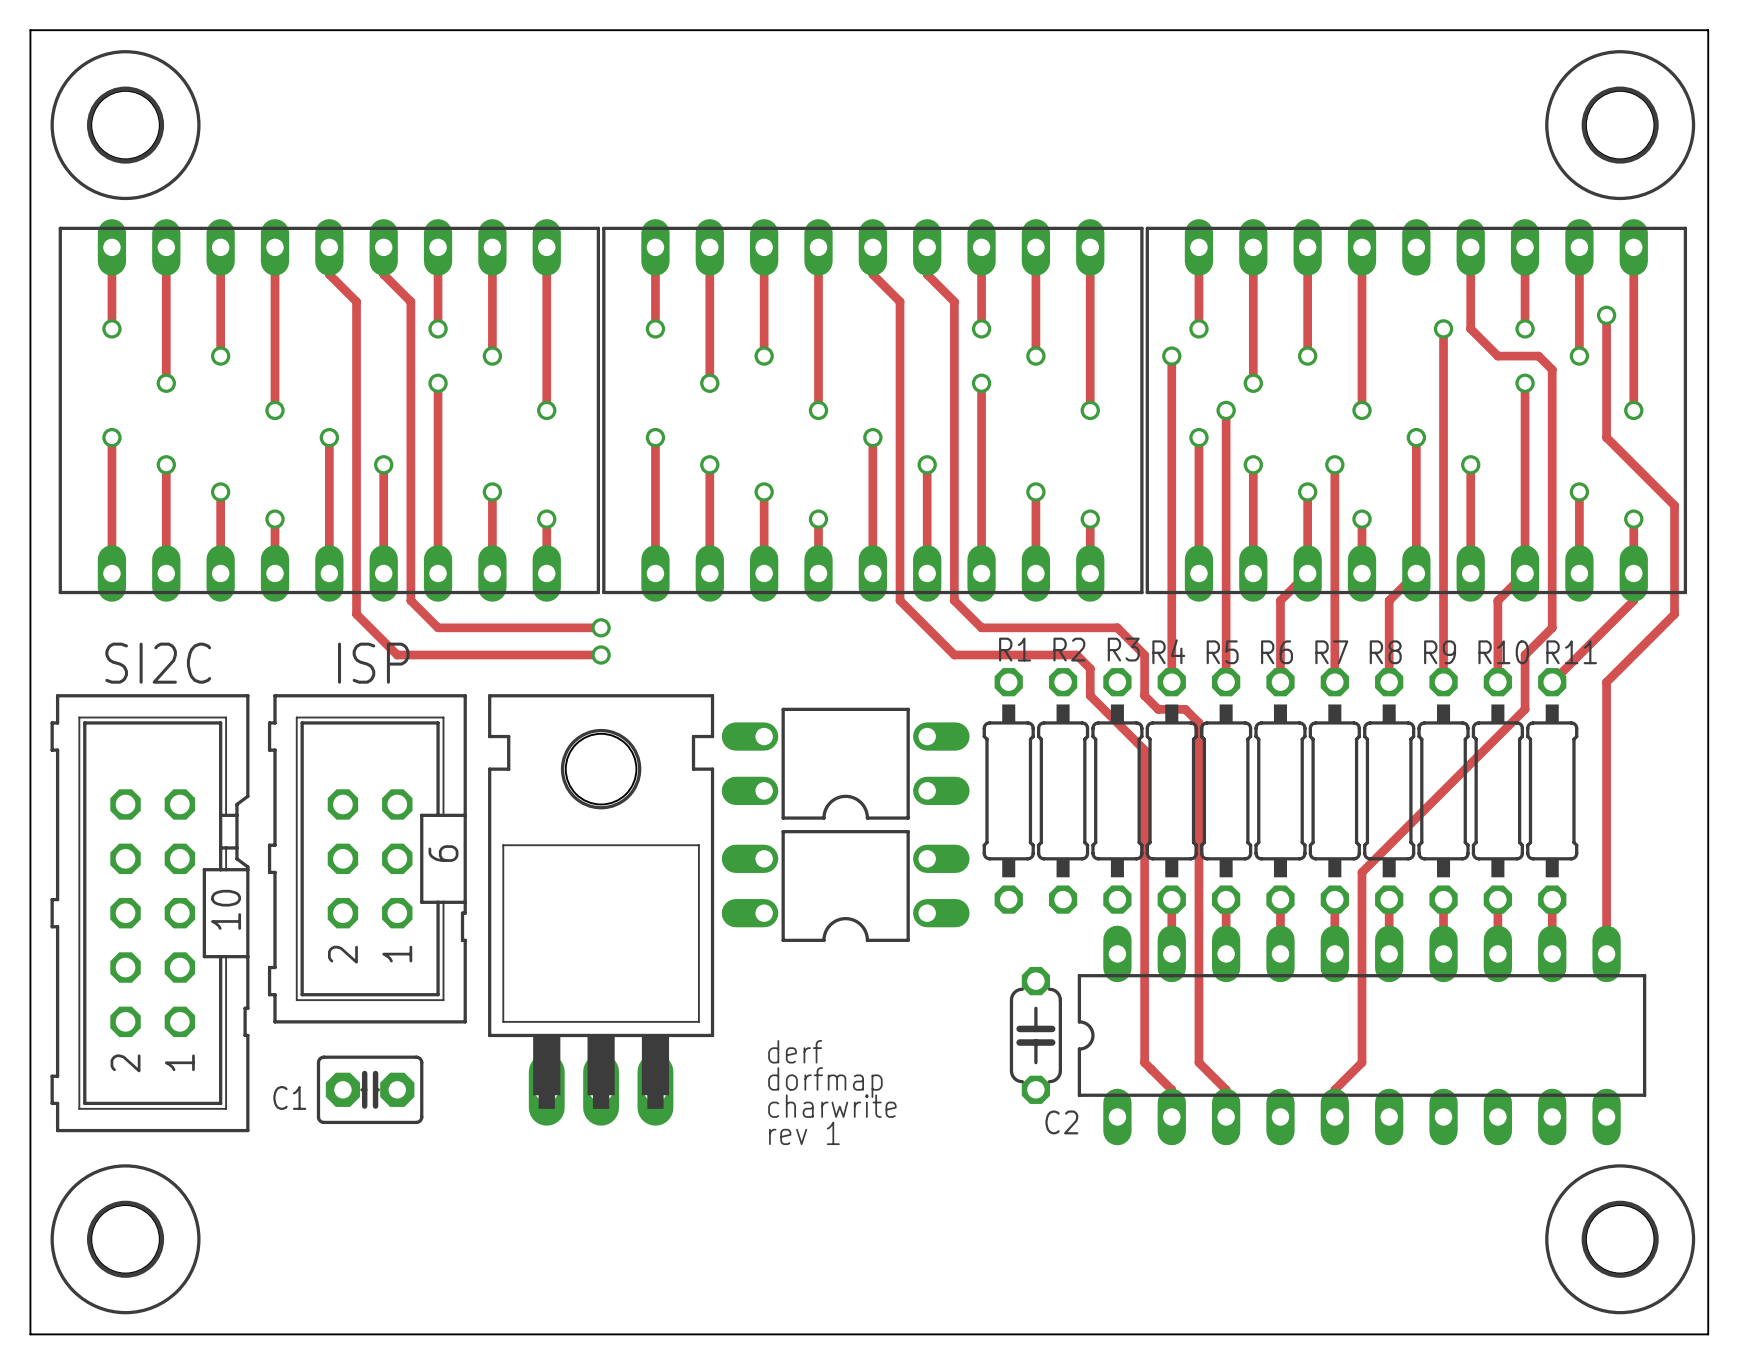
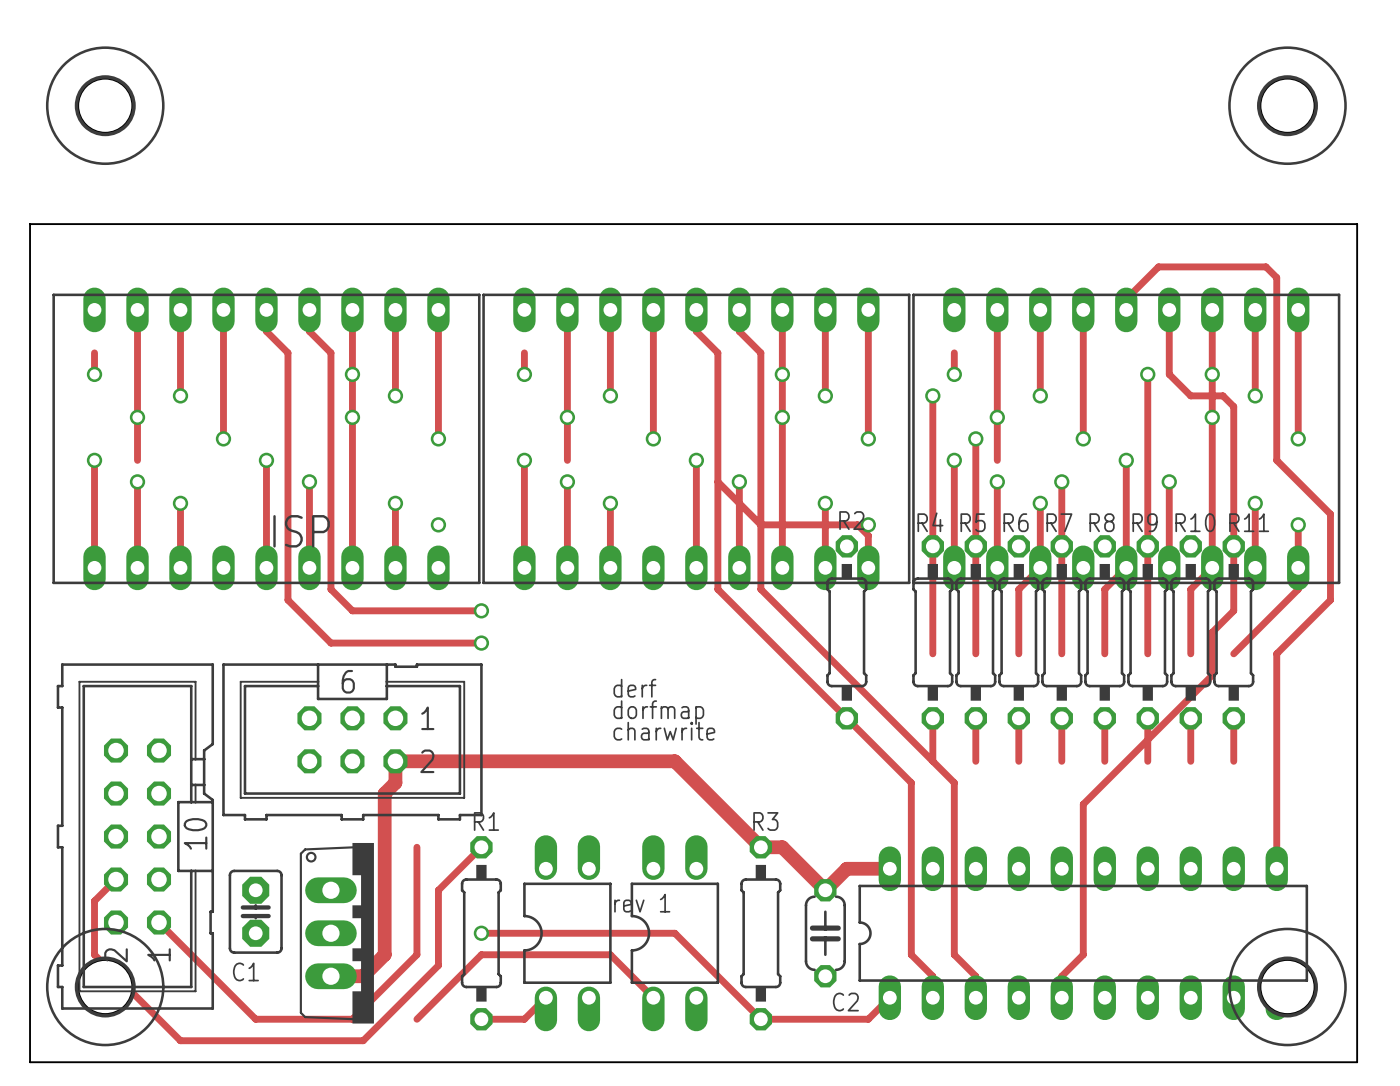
track: (111, 247) (111, 328) -> (180, 503) (180, 567)
track: (166, 247) (166, 383) -> (137, 374) (137, 309)
track: (220, 247) (220, 356) -> (223, 331) (223, 417)
track: (275, 247) (275, 383) -> (352, 460) (352, 567)
track: (329, 247) (329, 274) (356, 301) (356, 437) -> (266, 309) (266, 331) (287, 352)
track: (383, 247) (383, 274) (410, 301) (410, 437) -> (309, 309) (309, 331) (330, 352)
track: (438, 247) (438, 328) -> (395, 503) (395, 567)
track: (492, 247) (492, 356) -> (438, 331) (438, 417)
track: (546, 247) (546, 383) -> none
track: (655, 247) (655, 328) -> (610, 503) (610, 567)
track: (709, 247) (709, 383) -> (567, 374) (567, 309)
track: (764, 247) (764, 356) -> (653, 331) (653, 417)
track: (818, 247) (818, 383) -> (782, 460) (782, 567)
track: (872, 247) (872, 274) (900, 301) (900, 437) -> (696, 309) (696, 331) (717, 352)
track: (927, 247) (927, 274) (954, 301) (954, 437) -> (739, 309) (739, 331) (760, 352)
track: (981, 247) (981, 328) -> (825, 503) (825, 567)
track: (1035, 247) (1035, 356) -> (868, 331) (868, 417)
track: (1090, 247) (1090, 383) -> (932, 546) (932, 653)
track: (1198, 247) (1198, 328) -> none
track: (1253, 247) (1253, 383) -> (997, 374) (997, 309)
track: (1307, 247) (1307, 356) -> (1083, 331) (1083, 417)
track: (1362, 247) (1362, 383) -> (1147, 546) (1147, 653)
track: (1470, 247) (1470, 328) (1497, 356) (1538, 356) (1552, 369) (1552, 505) -> (1169, 309) (1169, 374) (1190, 395) (1223, 395) (1233, 406)
track: (1525, 247) (1525, 328) -> (1255, 503) (1255, 567)
track: (1579, 247) (1579, 356) -> (1298, 331) (1298, 417)
track: (1633, 247) (1633, 383) -> none
board edge: (30, 274) (30, 30) (1708, 30) (1708, 274) -> (30, 224) (1357, 224)
track: (1606, 315) (1606, 342) -> (1126, 320) (1126, 299) (1158, 266) (1265, 266) (1276, 277)
via: (1606, 315) -> none
via: (111, 328) -> none
via: (438, 328) -> none
via: (655, 328) -> none
via: (981, 328) -> none
via: (1198, 328) -> none
track: (1443, 328) (1443, 464) -> none
via: (1443, 328) -> none
via: (1525, 328) -> none
via: (220, 356) -> none
via: (492, 356) -> none
via: (764, 356) -> none
via: (1035, 356) -> none
track: (1171, 356) (1171, 491) -> (1061, 546) (1061, 653)
via: (1171, 356) -> none
via: (1307, 356) -> none
via: (1579, 356) -> none
via: (166, 383) -> none
via: (438, 383) -> none
via: (709, 383) -> none
via: (981, 383) -> none
via: (1253, 383) -> none
via: (1525, 383) -> none
via: (275, 410) -> none
part position: (329, 410) -> (266, 438)
via: (546, 410) -> none
via: (818, 410) -> none
part position: (872, 410) -> (696, 438)
via: (1090, 410) -> none
track: (1226, 410) (1226, 546) -> none
via: (1226, 410) -> none
via: (1362, 410) -> none
part position: (1416, 410) -> (1126, 438)
via: (1633, 410) -> none
via: (111, 437) -> none
track: (329, 437) (329, 573) -> (266, 567) (266, 460)
via: (329, 437) -> none
via: (655, 437) -> none
track: (872, 437) (872, 573) -> (696, 567) (696, 460)
via: (872, 437) -> none
via: (1198, 437) -> none
track: (1416, 437) (1416, 573) (1389, 600) (1389, 682) -> (1126, 460) (1126, 567) (1104, 589) (1104, 653)
via: (1416, 437) -> none
track: (1606, 437) (1674, 505) (1674, 614) (1606, 682) (1606, 818) -> (1276, 352) (1276, 460) (1330, 514) (1330, 600) (1276, 653)
track: (111, 464) (111, 573) -> (94, 567) (94, 460)
via: none -> (94, 374)
via: (166, 464) -> none
track: (383, 464) (383, 573) -> (309, 481) (309, 567)
via: (383, 464) -> none
via: none -> (352, 374)
track: (655, 464) (655, 573) -> (524, 567) (524, 460)
via: none -> (524, 374)
via: (709, 464) -> none
track: (927, 464) (927, 573) -> (739, 481) (739, 567)
via: (927, 464) -> none
via: none -> (782, 374)
track: (1198, 464) (1198, 573) -> (954, 567) (954, 460)
via: none -> (954, 374)
via: (1253, 464) -> none
track: (1334, 464) (1334, 600) -> (975, 546) (975, 653)
via: (1334, 464) -> none
via: none -> (1147, 374)
track: (1470, 464) (1470, 573) -> (1169, 481) (1169, 567)
via: (1470, 464) -> none
via: none -> (1212, 374)
track: (220, 491) (220, 573) -> (180, 395) (180, 309)
track: (492, 491) (492, 573) -> (395, 395) (395, 309)
track: (764, 491) (764, 573) -> (610, 395) (610, 309)
track: (1035, 491) (1035, 573) -> (825, 395) (825, 309)
via: none -> (932, 395)
track: (1307, 491) (1307, 573) (1280, 600) (1280, 682) -> (1040, 395) (1040, 309)
track: (1579, 491) (1579, 573) -> (1255, 395) (1255, 309)
via: none -> (137, 417)
via position: (275, 519) -> (223, 438)
via: none -> (352, 417)
via position: (546, 519) -> (438, 438)
via: none -> (567, 417)
via position: (818, 519) -> (653, 438)
via: none -> (782, 417)
via position: (1090, 519) -> (868, 438)
via: none -> (997, 417)
via position: (1362, 519) -> (1083, 438)
via: none -> (1212, 417)
via position: (1633, 519) -> (1298, 438)
via: none -> (975, 438)
track: (1633, 546) (1633, 600) (1552, 682) -> none
via: none -> (94, 460)
via: none -> (266, 460)
via: none -> (524, 460)
via: none -> (696, 460)
via: none -> (954, 460)
via: none -> (1126, 460)
track: (1525, 573) (1497, 600) (1497, 682) -> (1212, 460) (1212, 524)
track: none -> (137, 481) (137, 567)
via: none -> (137, 481)
via: none -> (309, 481)
track: (410, 600) (438, 627) (601, 627) -> (330, 481) (330, 589) (352, 610) (481, 610)
track: none -> (567, 481) (567, 567)
via: none -> (567, 481)
via: none -> (739, 481)
track: (954, 600) (981, 627) (1117, 627) (1144, 655) (1144, 695) (1158, 709) (1185, 709) (1198, 722) (1198, 981) -> (760, 481) (760, 589) (954, 782)
track: none -> (997, 481) (997, 567)
via: none -> (997, 481)
via: none -> (1061, 481)
via: none -> (1169, 481)
track: (356, 614) (397, 655) (601, 655) -> (287, 492) (287, 600) (330, 643) (481, 643)
via: none -> (180, 503)
via: none -> (395, 503)
via: (601, 627) -> none
via: none -> (610, 503)
via: none -> (825, 503)
track: none -> (1040, 503) (1040, 567) (1018, 589) (1018, 653)
via: none -> (1040, 503)
track: (1552, 627) (1525, 655) -> none
via: none -> (1255, 503)
via: none -> (438, 524)
via: (601, 655) -> none
via: none -> (868, 524)
track: none -> (1298, 524) (1298, 589) (1233, 653)
via: none -> (1298, 524)
text: SI2C (158, 663) -> none
track: (1090, 695) (1144, 750) (1144, 981) -> (717, 481) (717, 589) (911, 782)
track: (1497, 736) (1362, 872) (1362, 1008) -> (1233, 503) (1233, 610) (1212, 632) (1212, 675) (1083, 804)
track: none -> (1190, 589) (1190, 653)
via: none -> (481, 610)
part: (845, 763) -> none
R1 position: (1008, 790) -> (481, 933)
R3 position: (1117, 790) -> (760, 933)
via: none -> (481, 643)
part: (367, 858) -> none
part: (845, 886) -> none
part: (601, 909) -> none
part position: (149, 913) -> (135, 836)
part: none -> (352, 741)
track: none -> (1276, 761) (1276, 868)
C2 position: (1035, 1035) -> (825, 933)
part position: (1362, 1035) -> (1083, 933)
text position: derf (795, 1051) -> derf (634, 688)
track: none -> (416, 847) (416, 954) (352, 1019) (255, 1019) (158, 922)
track: none -> (481, 847) (438, 890) (438, 965) (363, 1040) (180, 1040) (94, 954) (94, 901) (116, 879)
track: (1144, 1062) (1171, 1089) (1171, 1116) -> (911, 847) (911, 954) (932, 976) (932, 997)
track: (1198, 1062) (1226, 1089) (1226, 1116) -> (954, 847) (954, 954) (975, 976) (975, 997)
track: (1362, 1062) (1334, 1089) (1334, 1116) -> (1083, 847) (1083, 954) (1061, 976) (1061, 997)
text position: dorfmap (825, 1082) -> dorfmap (658, 712)
C1 rotation: 0° (370, 1089) -> 90° clockwise (255, 911)
C1 position: (370, 1089) -> (255, 911)
track: none -> (889, 868) (846, 868) (825, 890) (782, 847) (760, 847) (674, 761) (395, 761) (395, 782) (384, 793) (384, 954) (363, 976) (330, 976)
C1 name position: C1 (289, 1097) -> C1 (245, 971)
text position: charwrite (832, 1106) -> charwrite (664, 731)
part: none -> (336, 933)
track: none -> (481, 933) (674, 933) (760, 1019) (868, 1019) (889, 997)
via: none -> (481, 933)
part: none -> (567, 933)
part: none -> (674, 933)
track: none -> (545, 997) (524, 1019) (481, 1019)
track: none -> (653, 997) (610, 954) (481, 954) (416, 1019)

